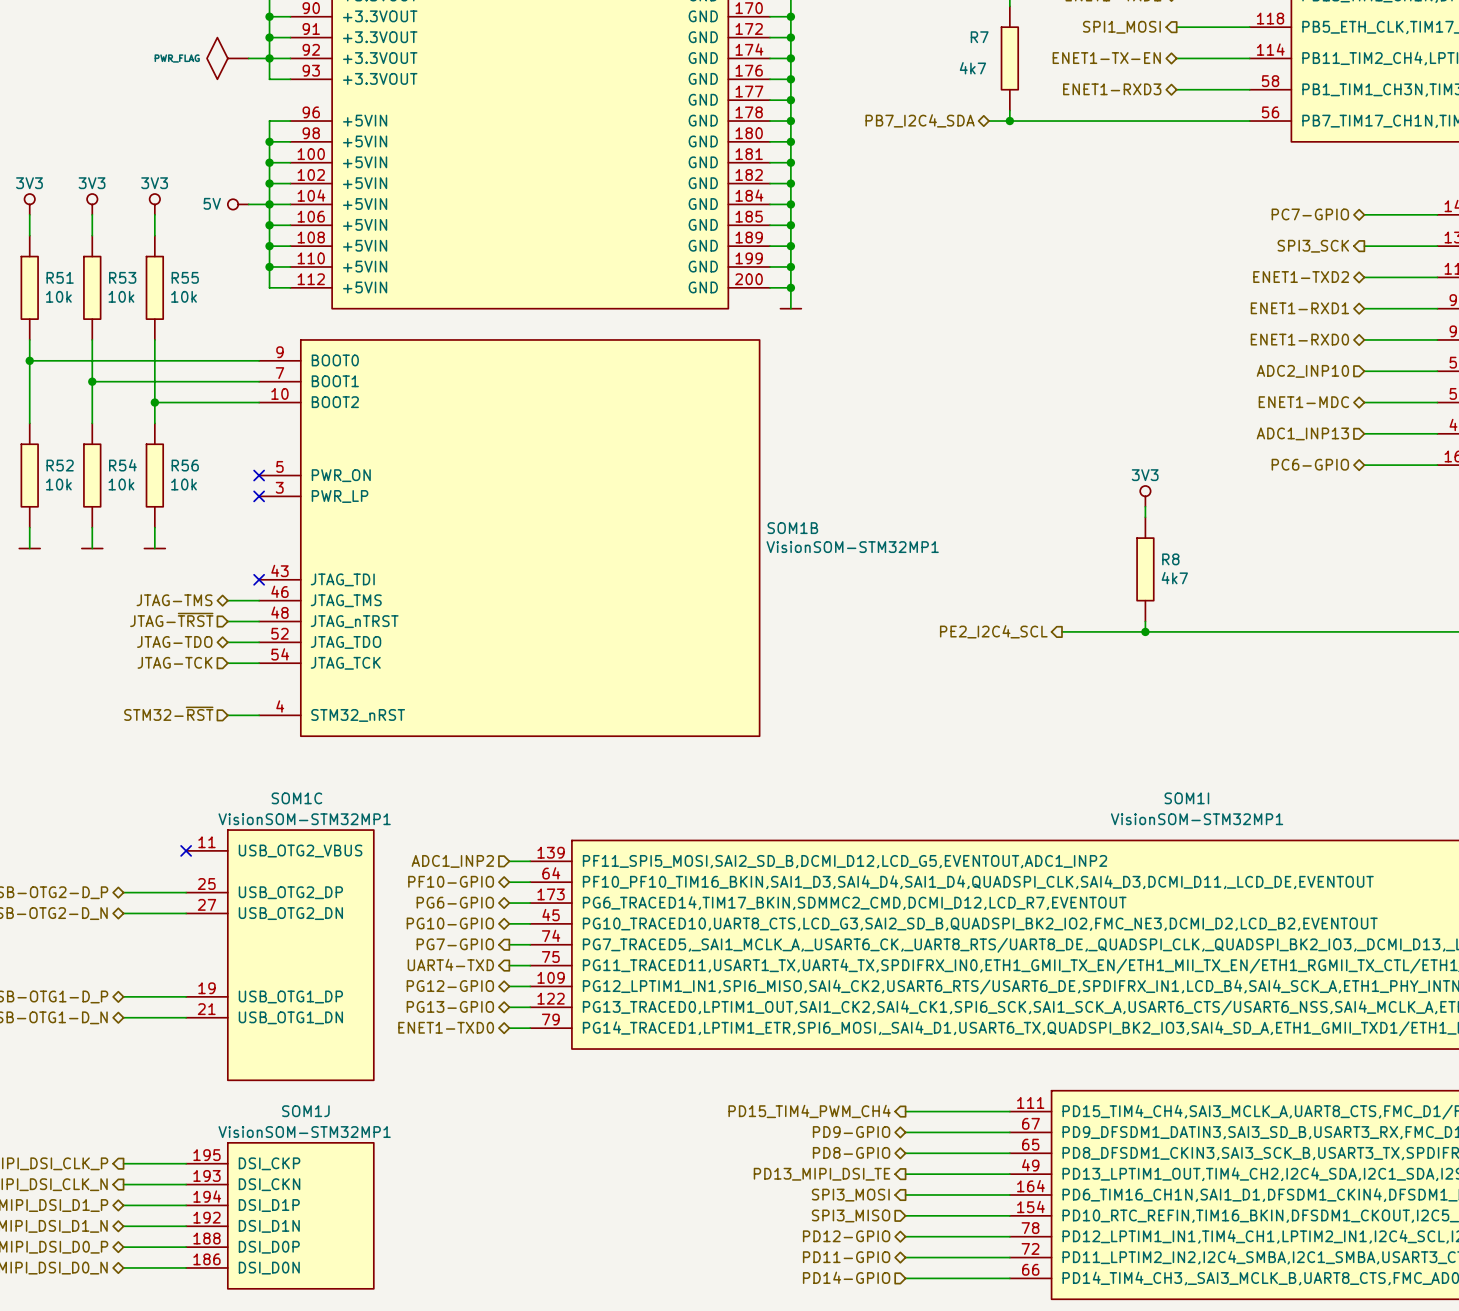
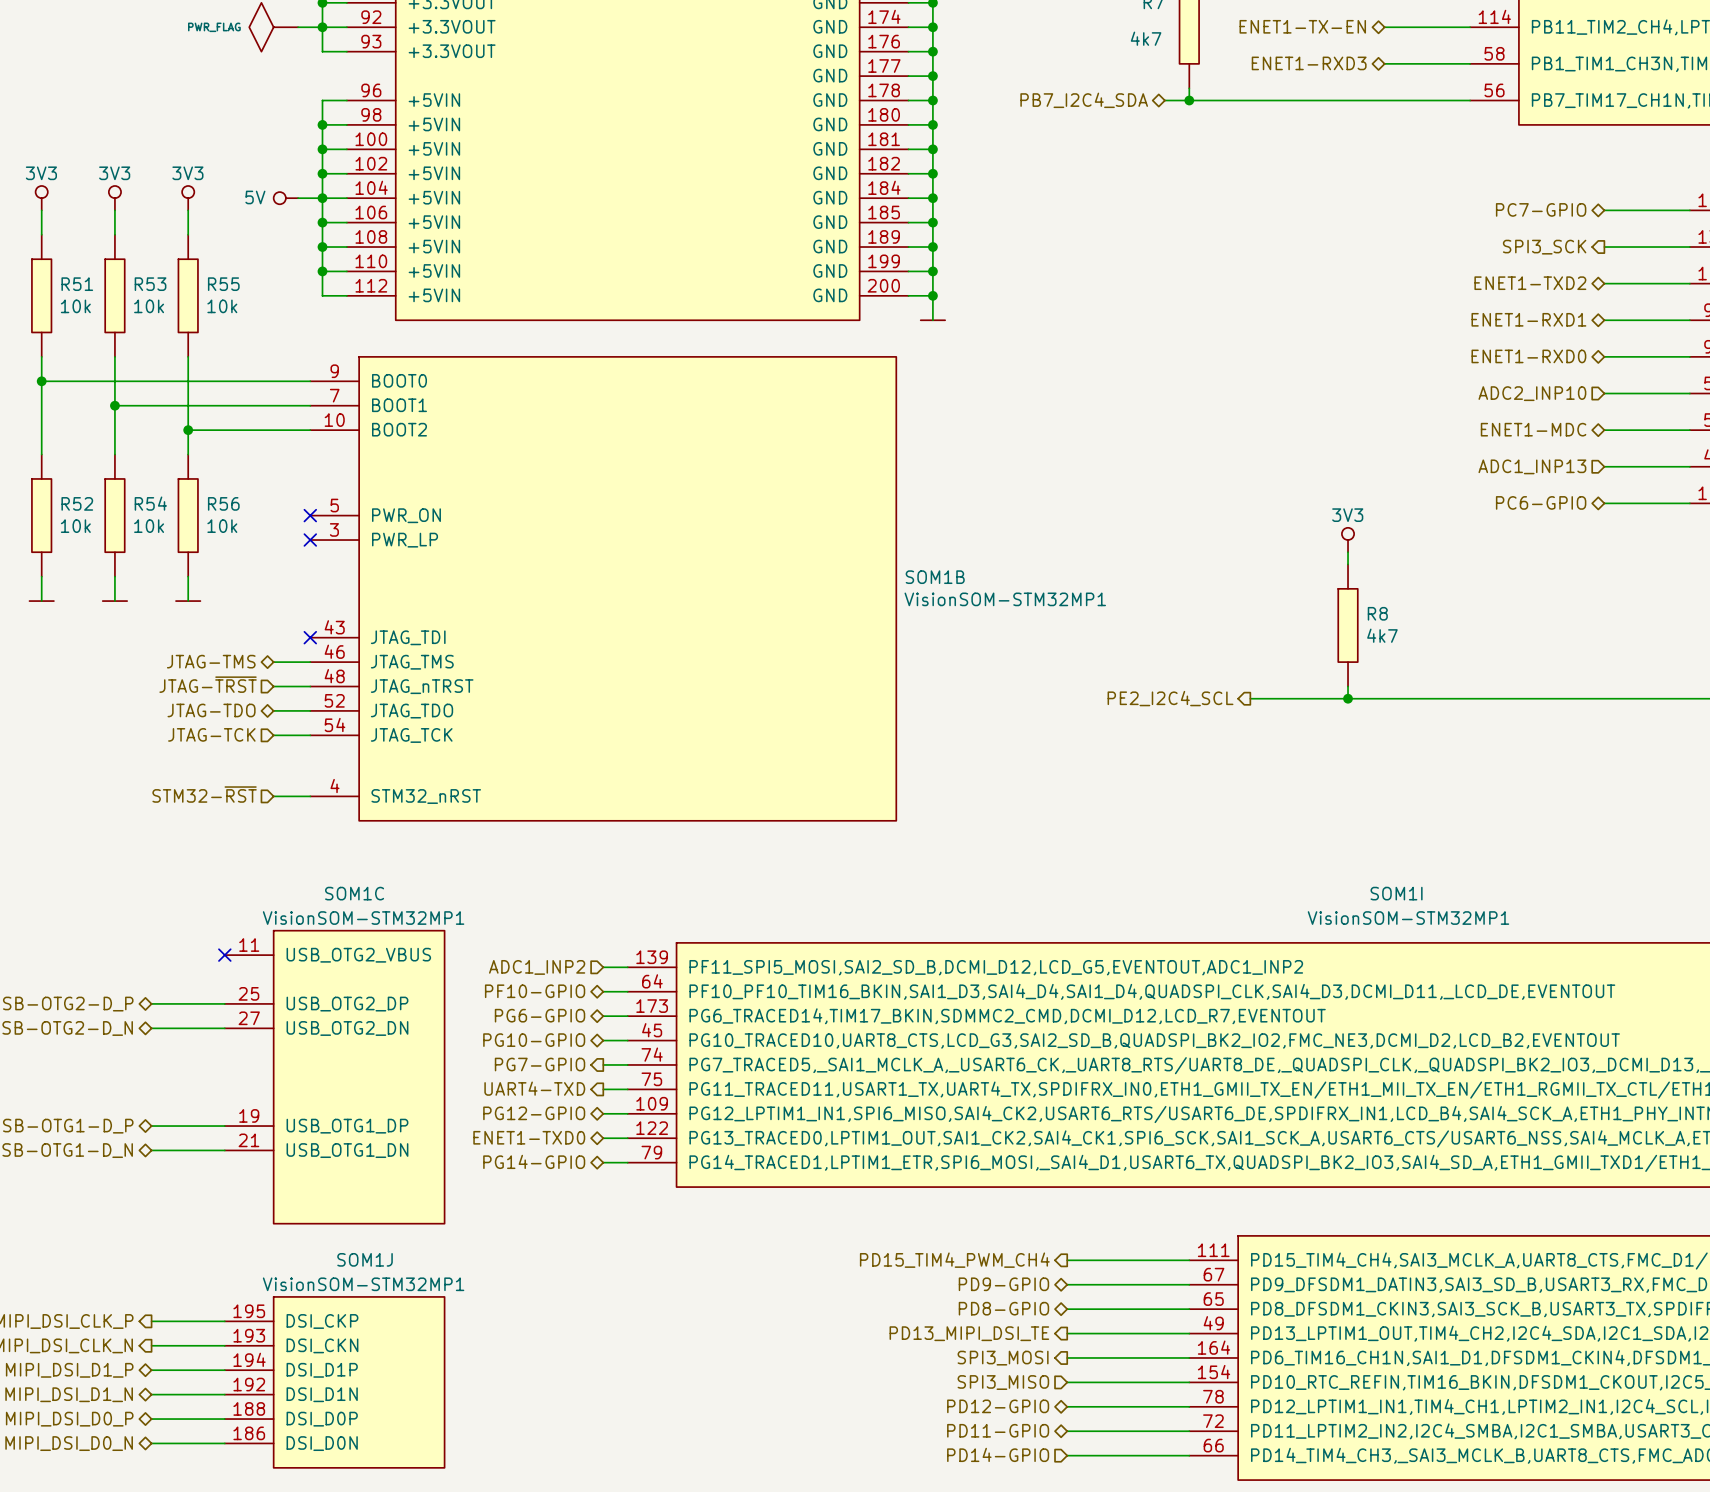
hierarchical label: PG13-GPIO (450, 1006) -> ENET1-TXD0 (529, 1137)
hierarchical label: ENET1-TXD0 (446, 1027) -> PG14-GPIO (534, 1161)

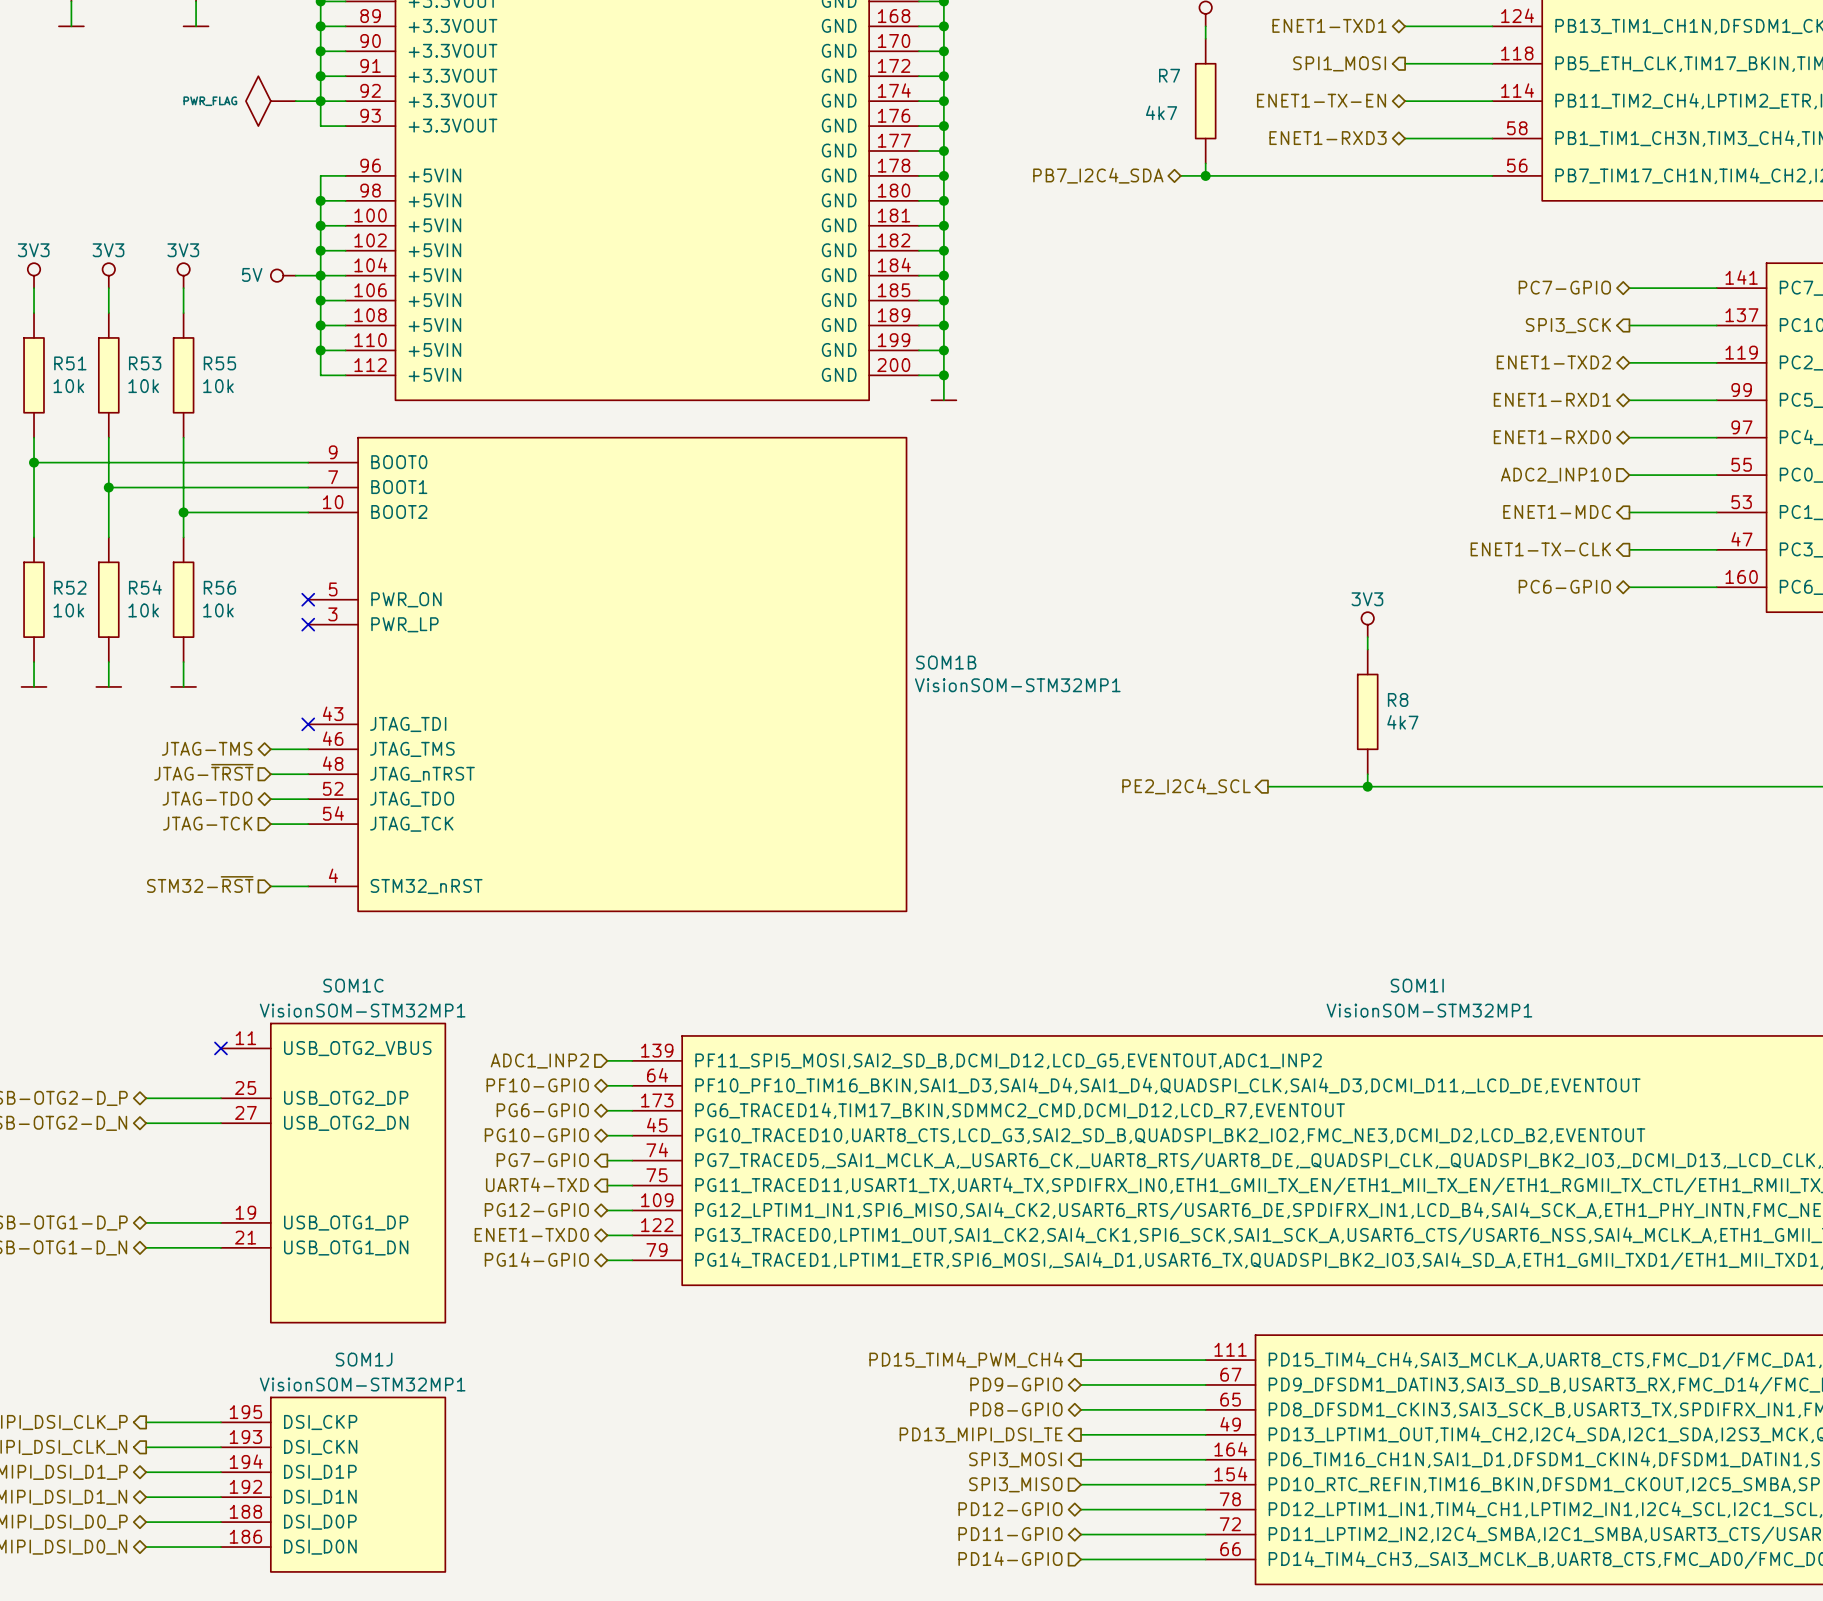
hierarchical label shape: bidirectional (1533, 429) -> output (1557, 512)
hierarchical label shape: input (1532, 466) -> output (1540, 549)
hierarchical label: ADC1_INP13 (1532, 466) -> ENET1-TX-CLK (1540, 549)

